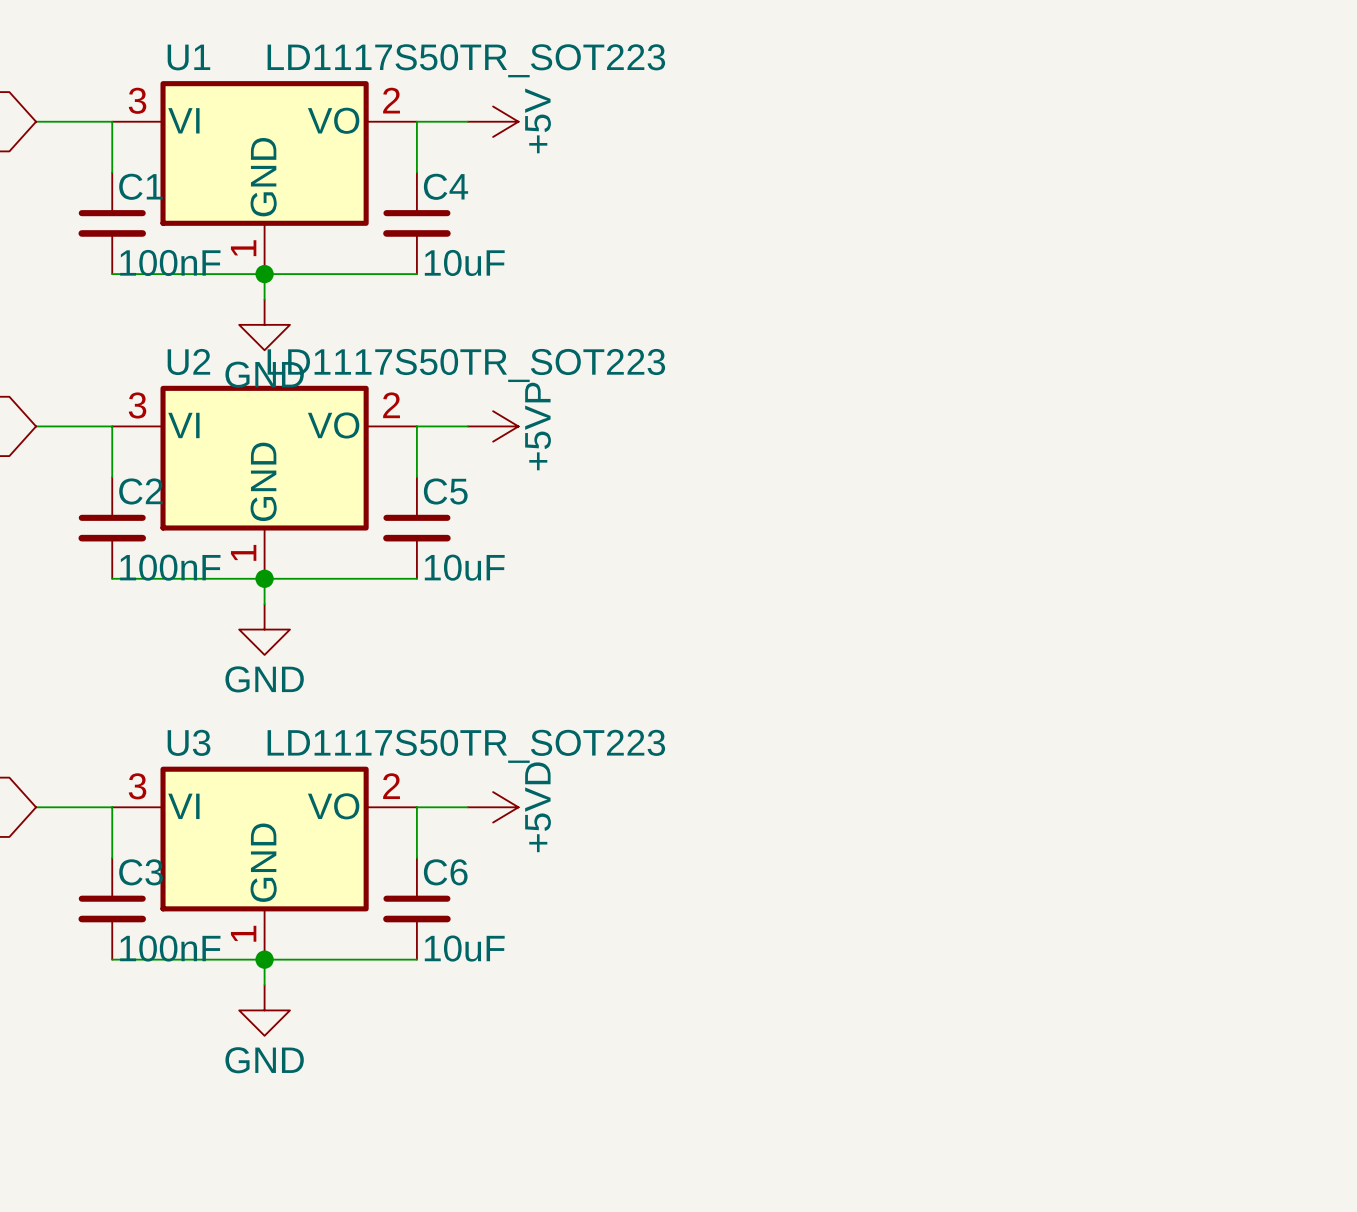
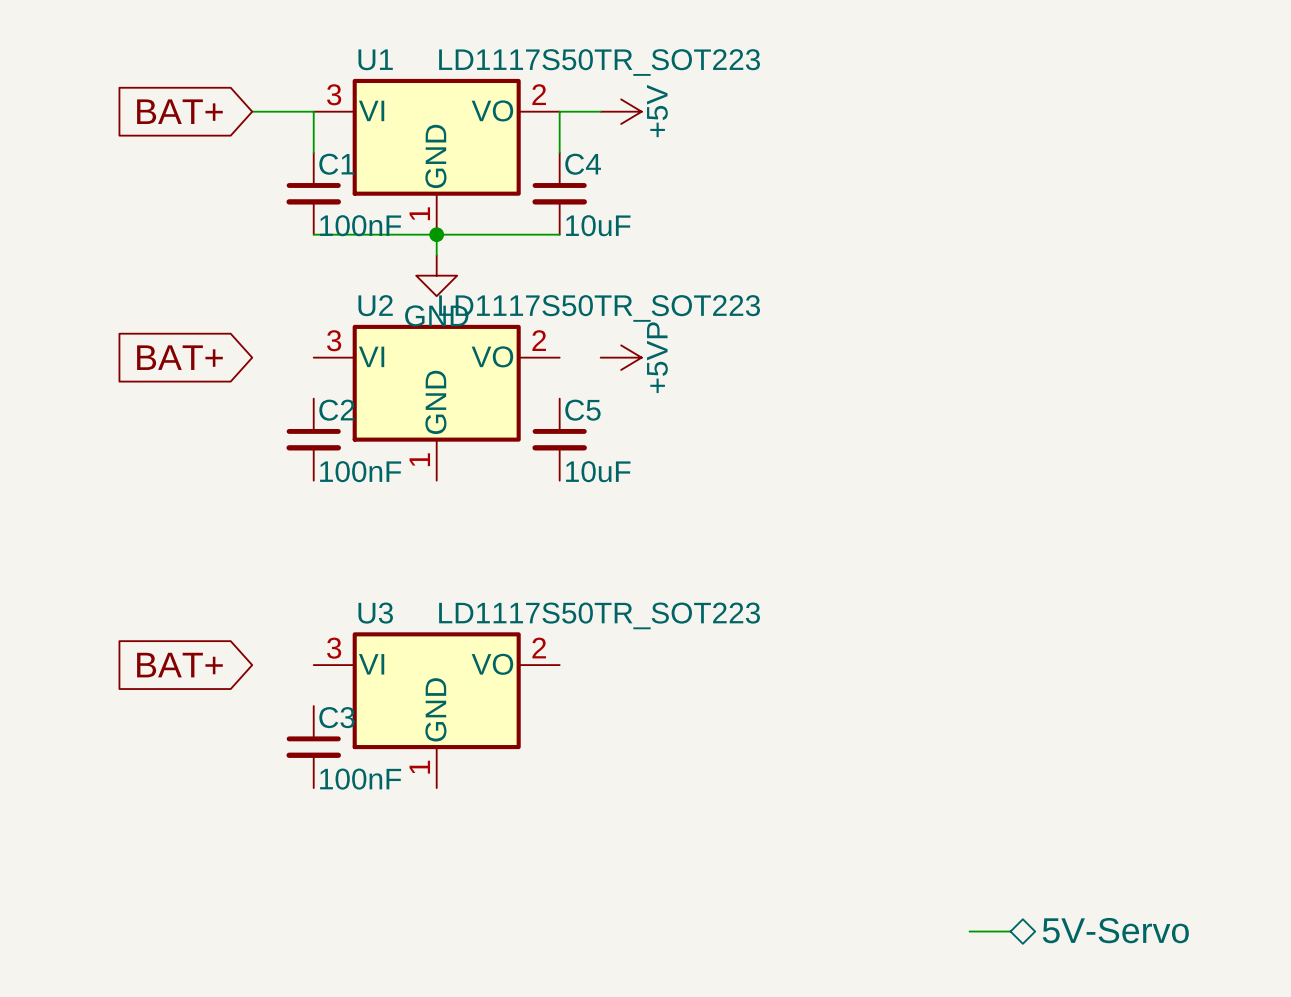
wire: (36, 426) (112, 426) (112, 477) -> none
wire: (467, 426) (416, 426) (416, 477) -> none
wire: (112, 578) (416, 578) -> none
wire: (264, 578) (264, 604) -> none
junction: (264, 578) -> none
power symbol: GND (264, 629) -> none
wire: (36, 807) (112, 807) (112, 858) -> none
wire: (467, 807) (416, 807) (416, 858) -> none
power symbol: +5VD (493, 807) -> none
C6: 10uF (416, 908) -> none
wire: (112, 959) (416, 959) -> none
wire: (264, 959) (264, 985) -> none
junction: (264, 959) -> none
power symbol: GND (264, 1010) -> none
sheet pin: none -> 5V-Servo (1115, 930)
wire: none -> (969, 931) (1010, 931)

